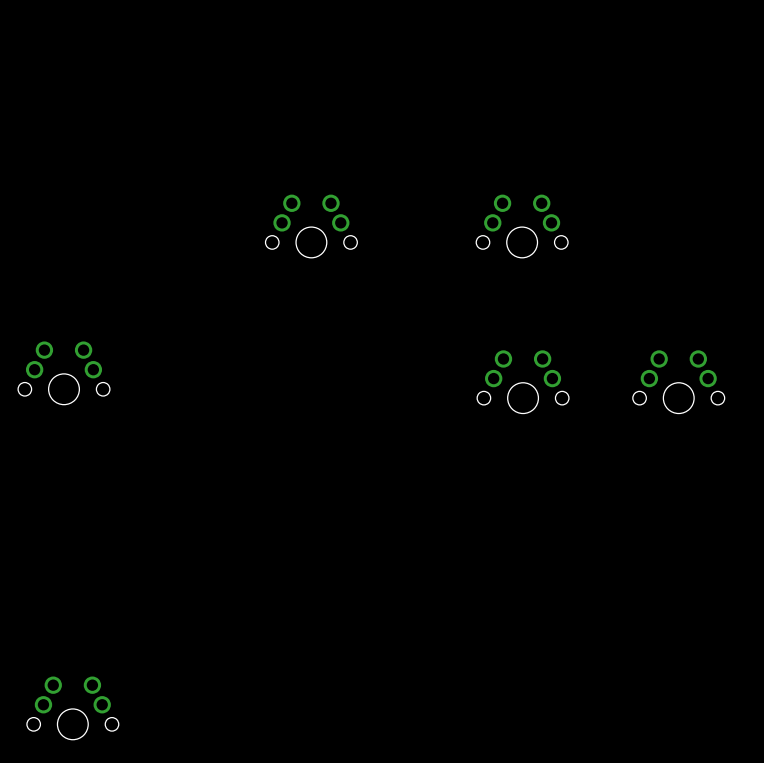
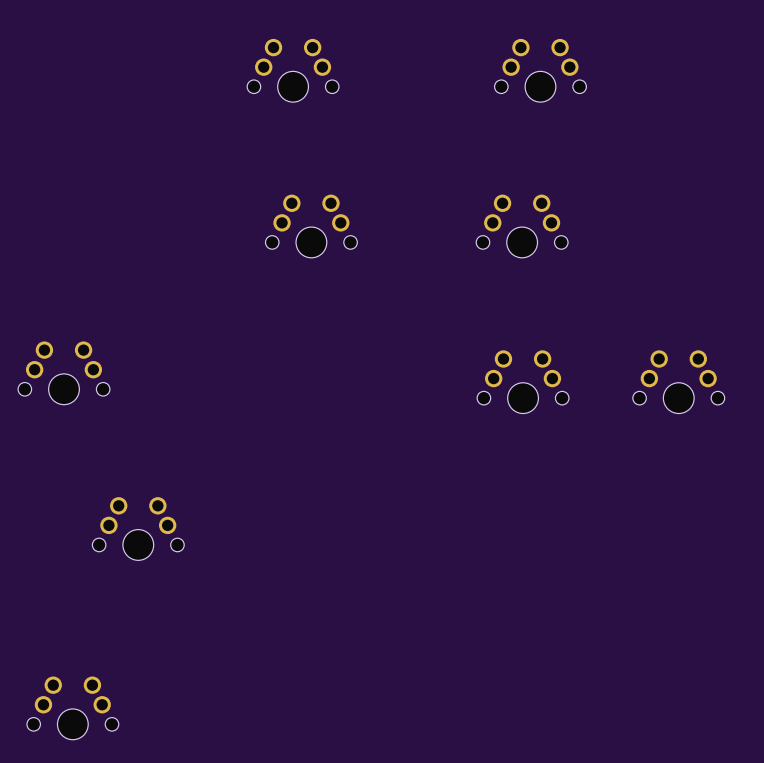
part: none -> (293, 70)
part: none -> (540, 70)
part: none -> (138, 528)

